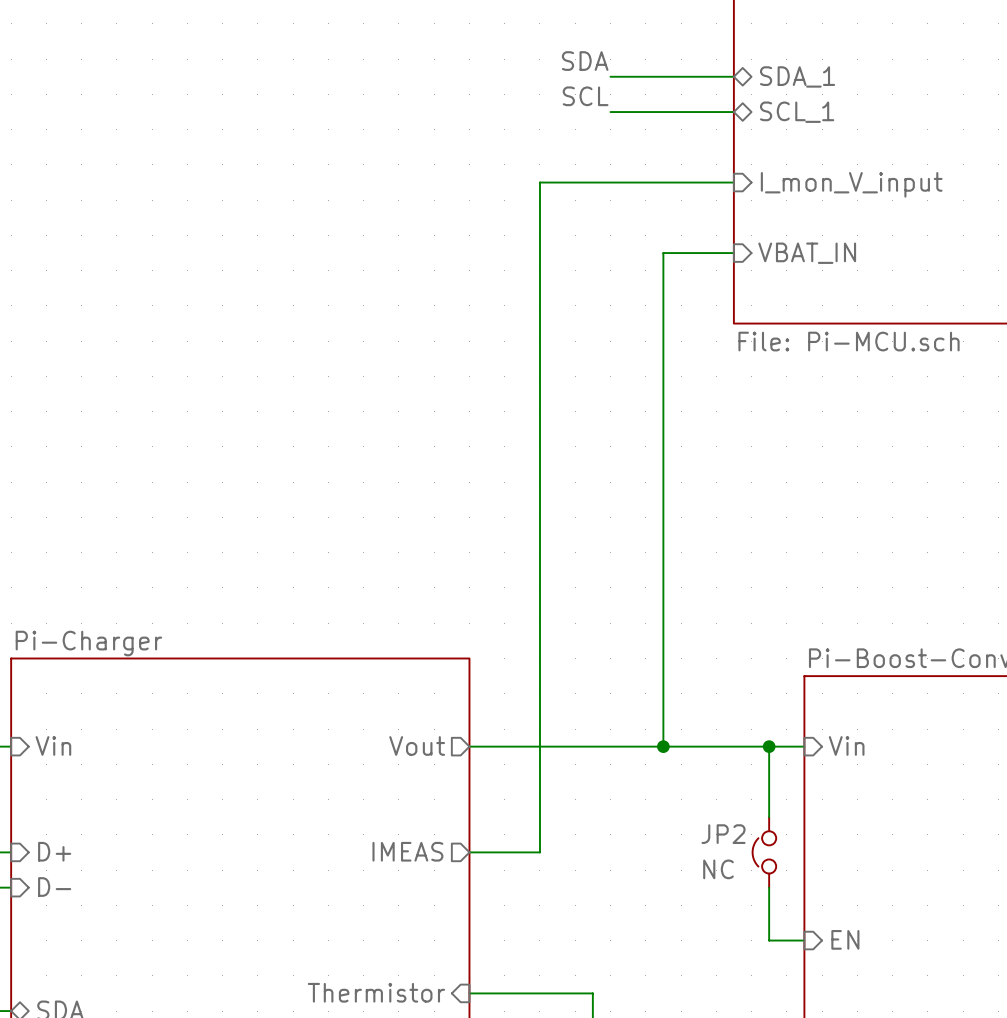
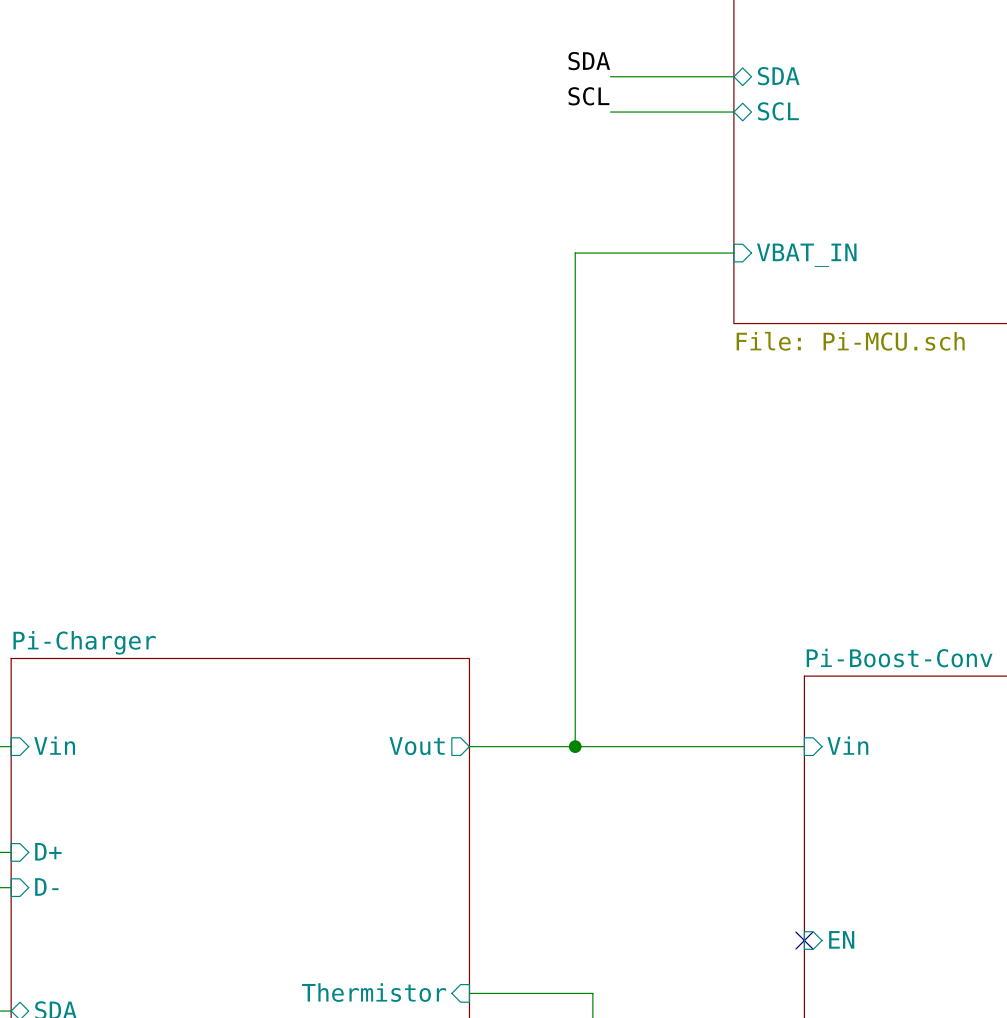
sheet pin: SDA_1 (797, 76) -> SDA (778, 76)
sheet pin: SCL_1 (797, 112) -> SCL (778, 111)
wire: (733, 182) (539, 182) (539, 852) (469, 852) -> none
sheet pin: I_mon_V_input (851, 184) -> none
wire: (663, 253) (663, 746) -> (663, 253) (575, 253) (575, 746)
junction: none -> (575, 746)
junction: (663, 746) -> none
wire: (769, 746) (769, 817) -> none
junction: (769, 746) -> none
sheet pin: IMEAS (407, 851) -> none
JP2: NC (764, 852) -> none
wire: (769, 887) (769, 940) (804, 940) -> none
no-connect mark: none -> (804, 940)

